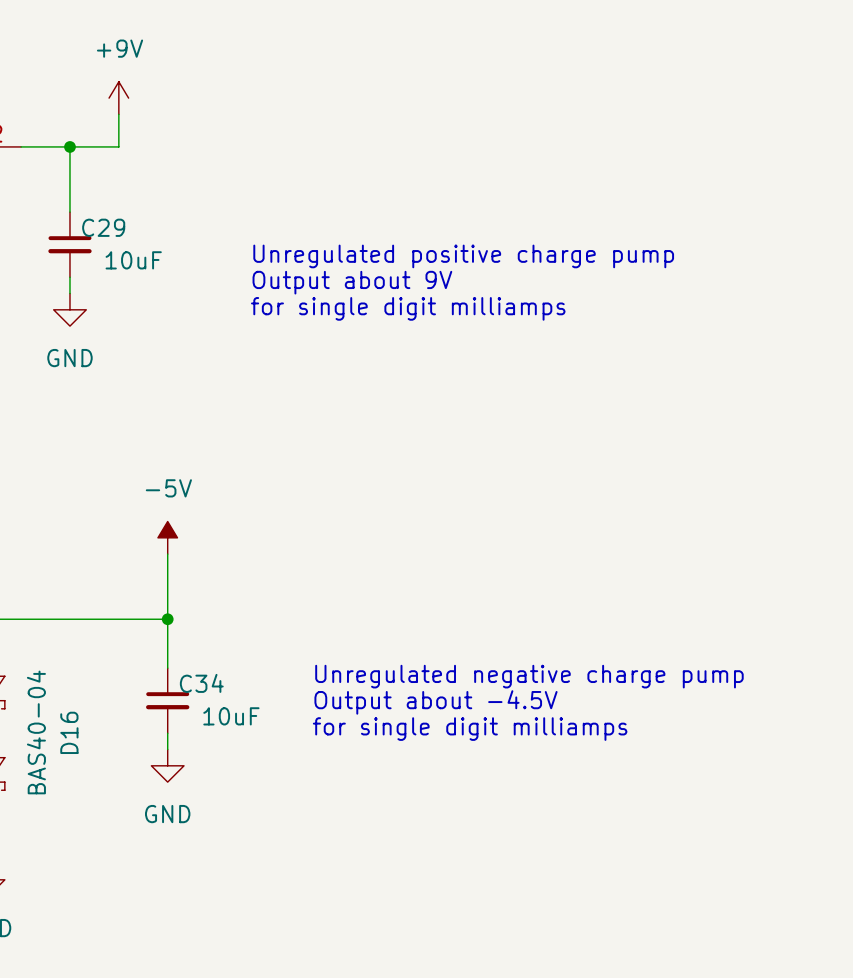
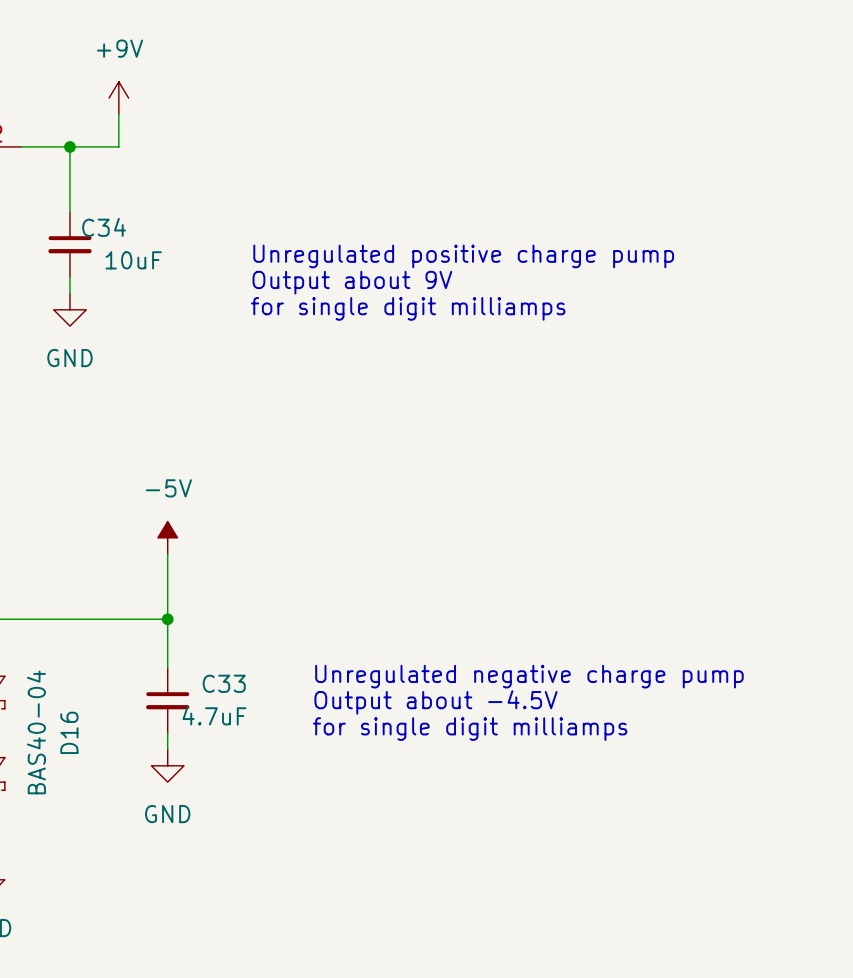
C29 name: C29 (103, 227) -> C34 (104, 227)
C34 name: C34 (201, 683) -> C33 (224, 683)
C34 value: 10uF (231, 716) -> 4.7uF (214, 715)

